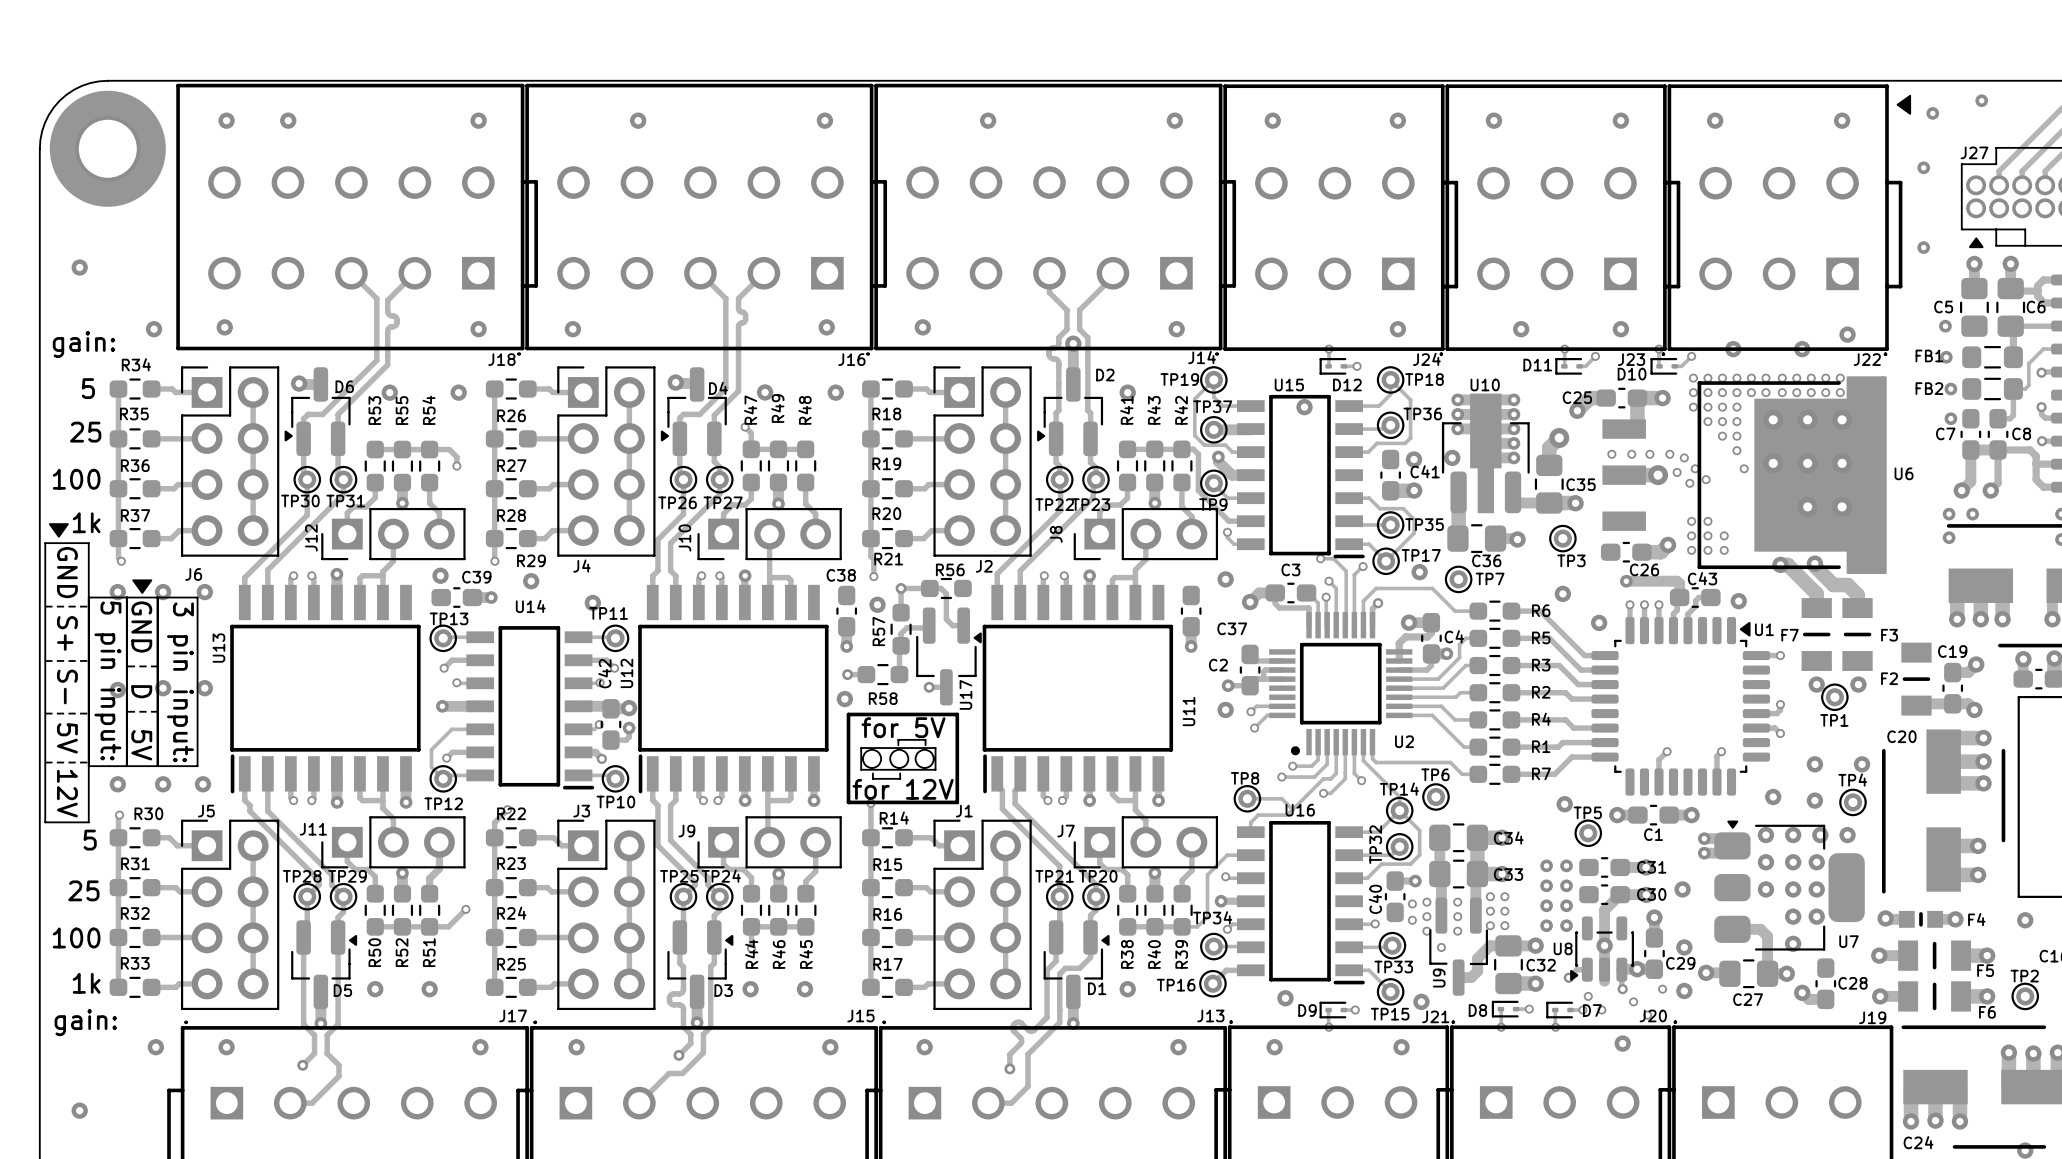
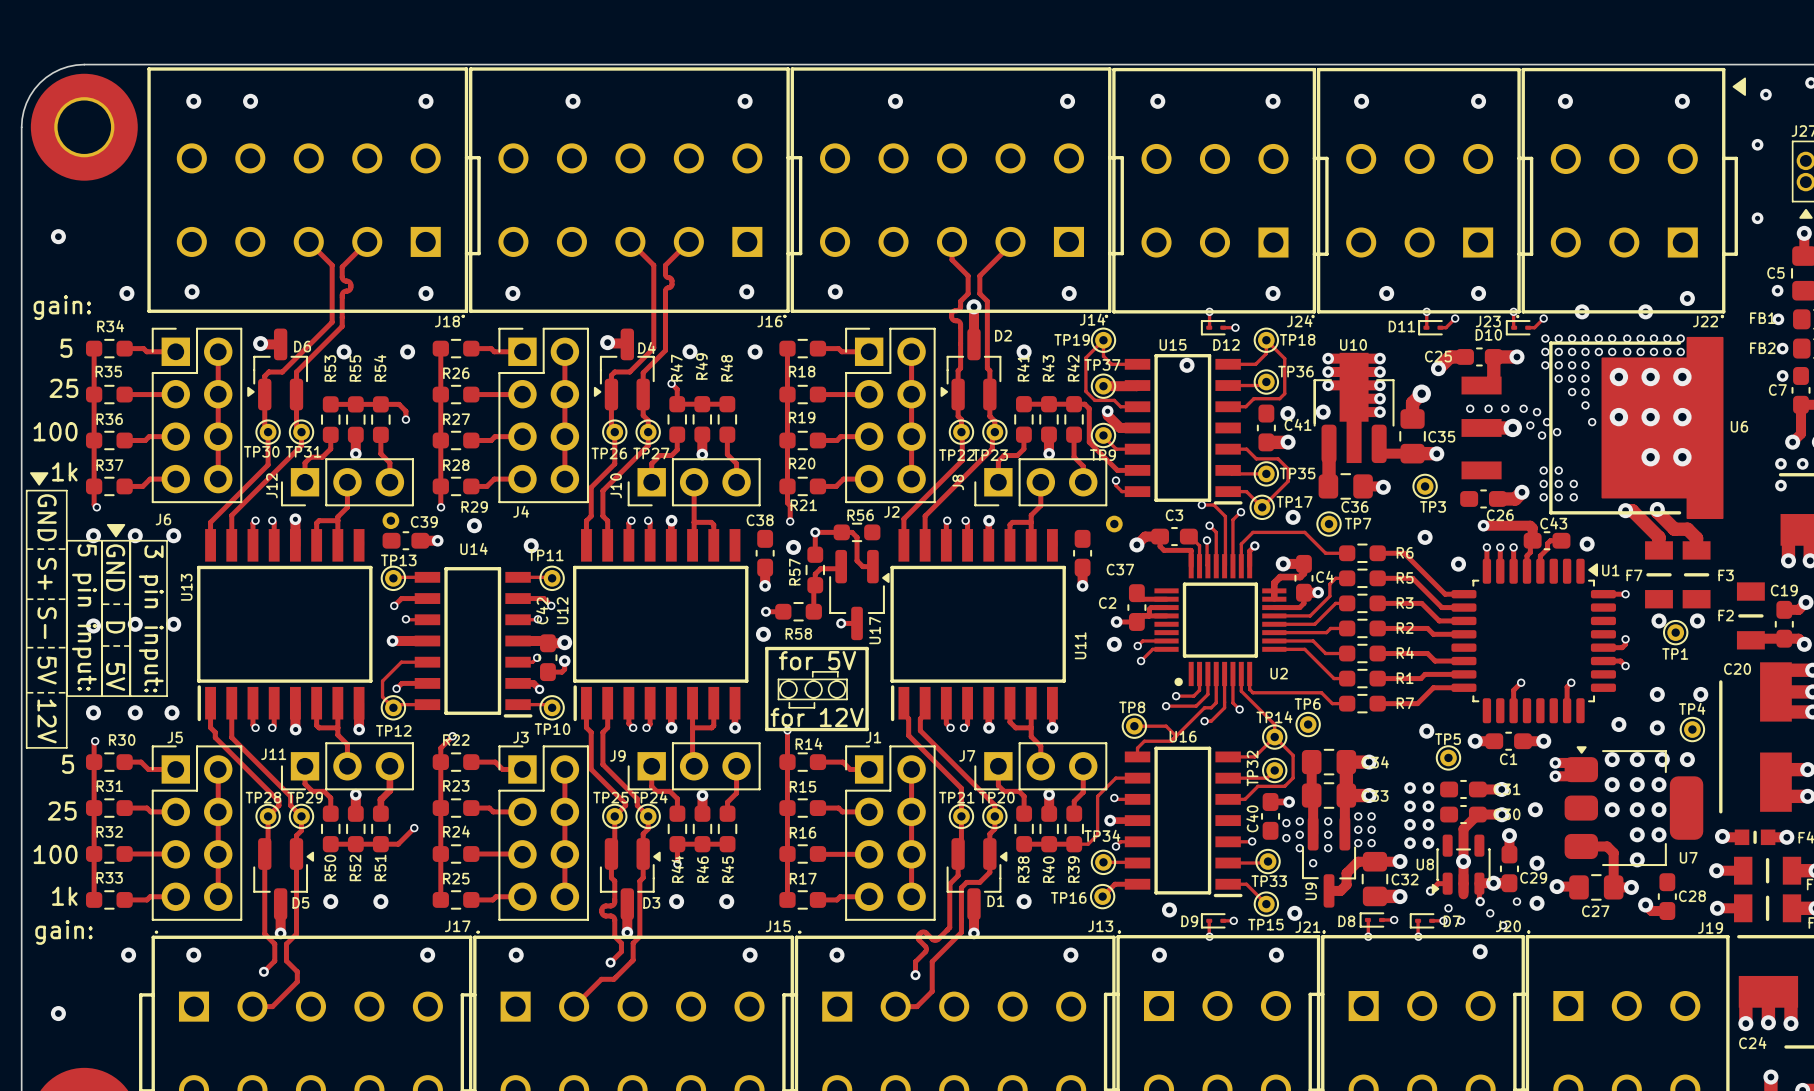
via: (440, 575) -> none
part: none -> (390, 520)
via: (1225, 579) -> none
part: none -> (1114, 524)

